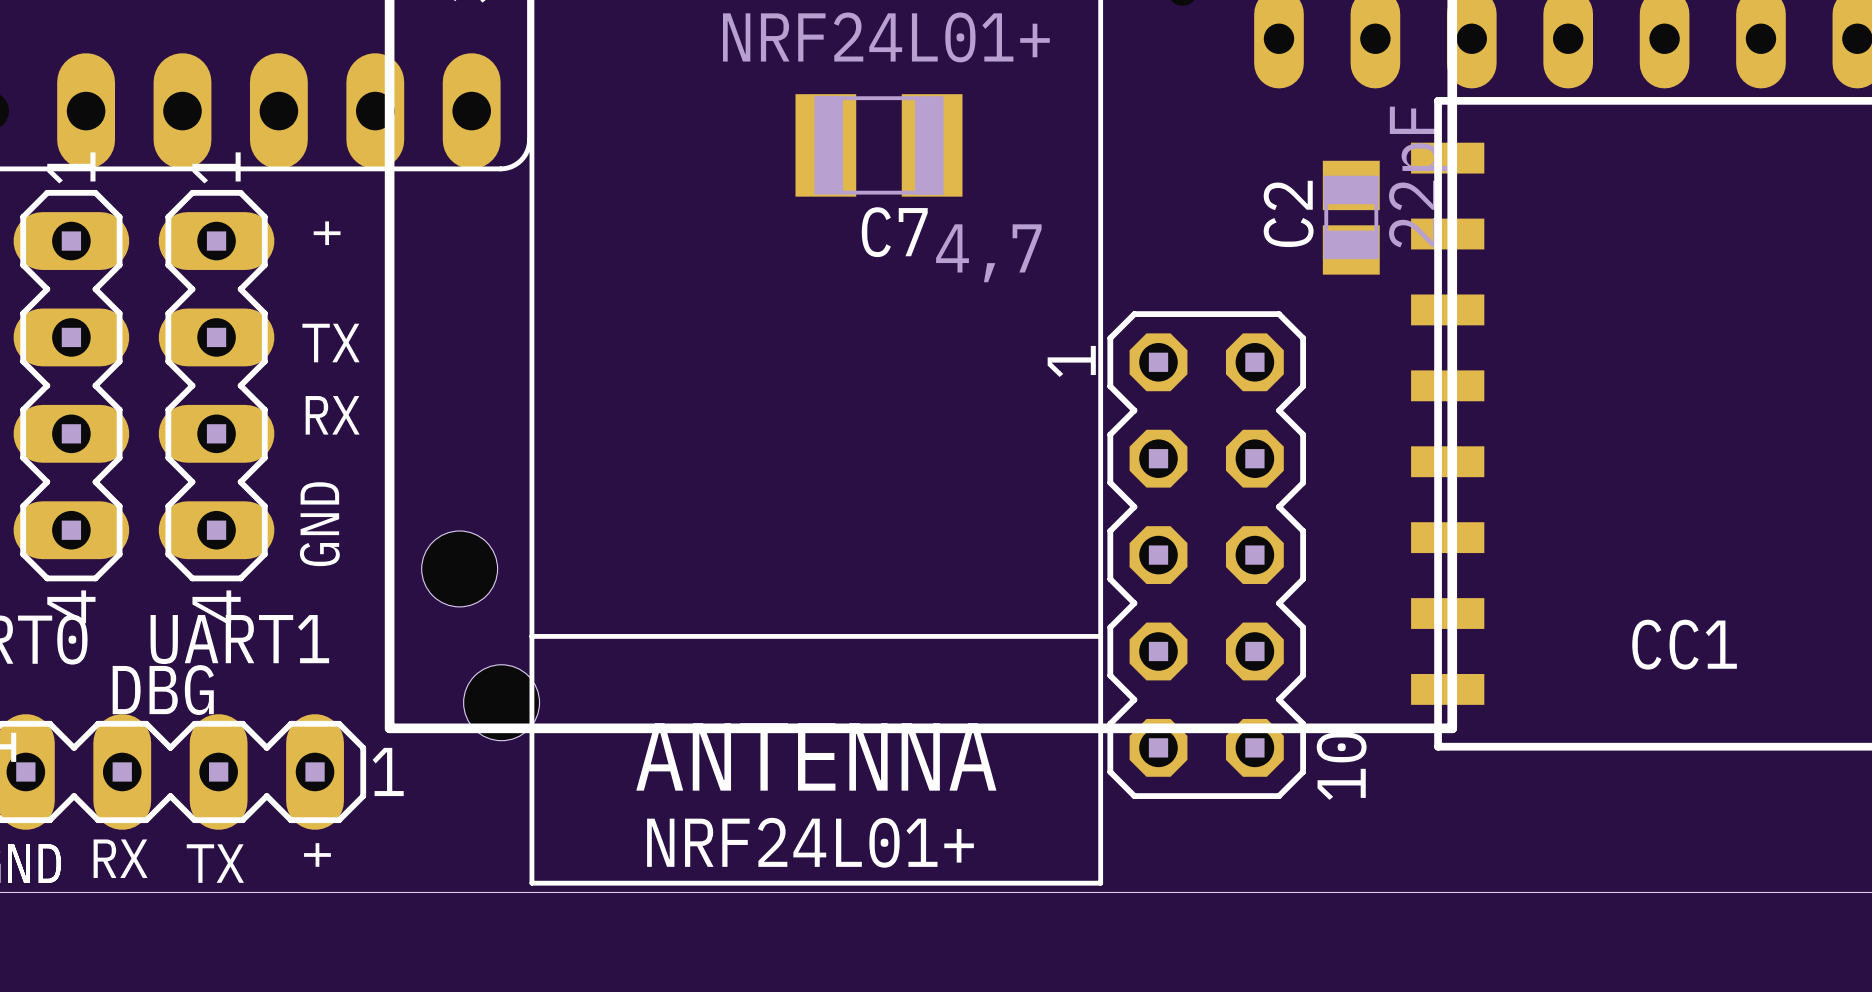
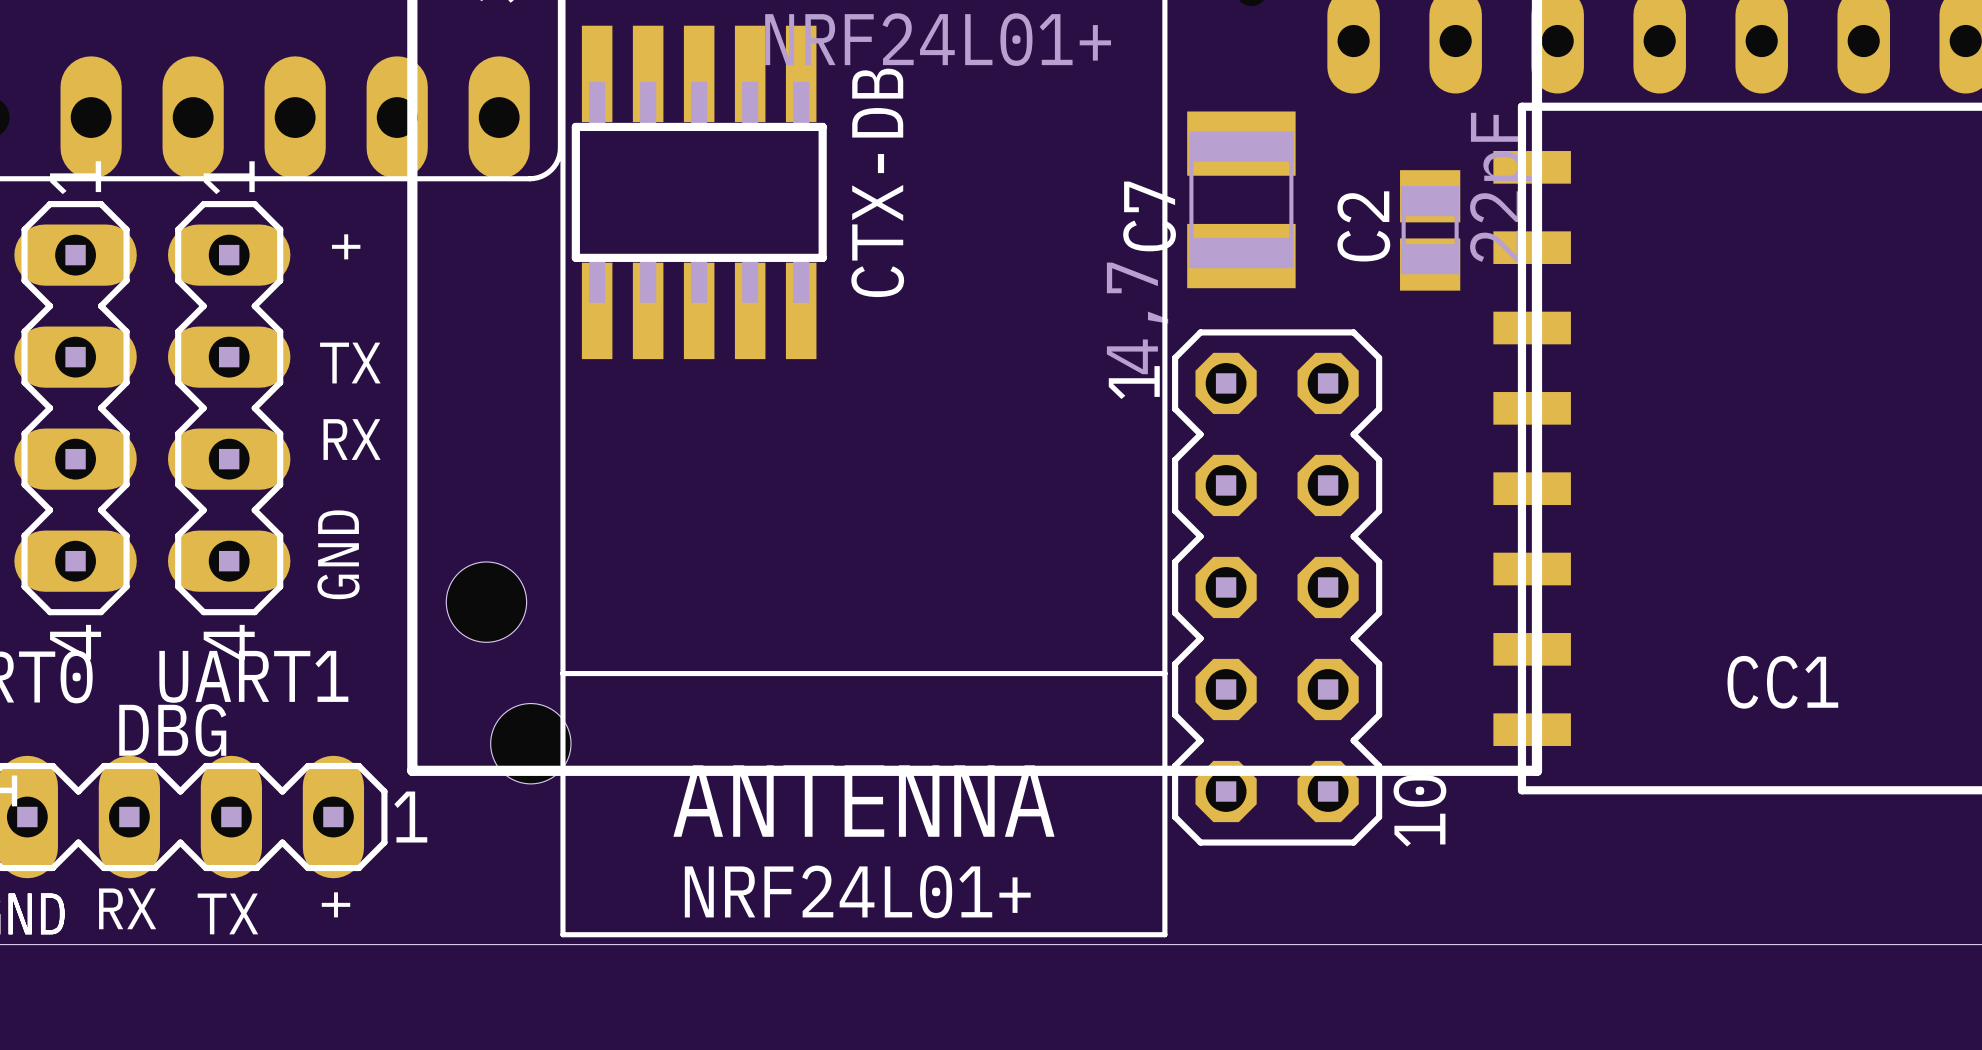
C7 rotation: 0° (878, 145) -> 90° clockwise (1241, 199)
C7 position: (878, 145) -> (1241, 199)
CTX-DB: none -> (699, 192)

